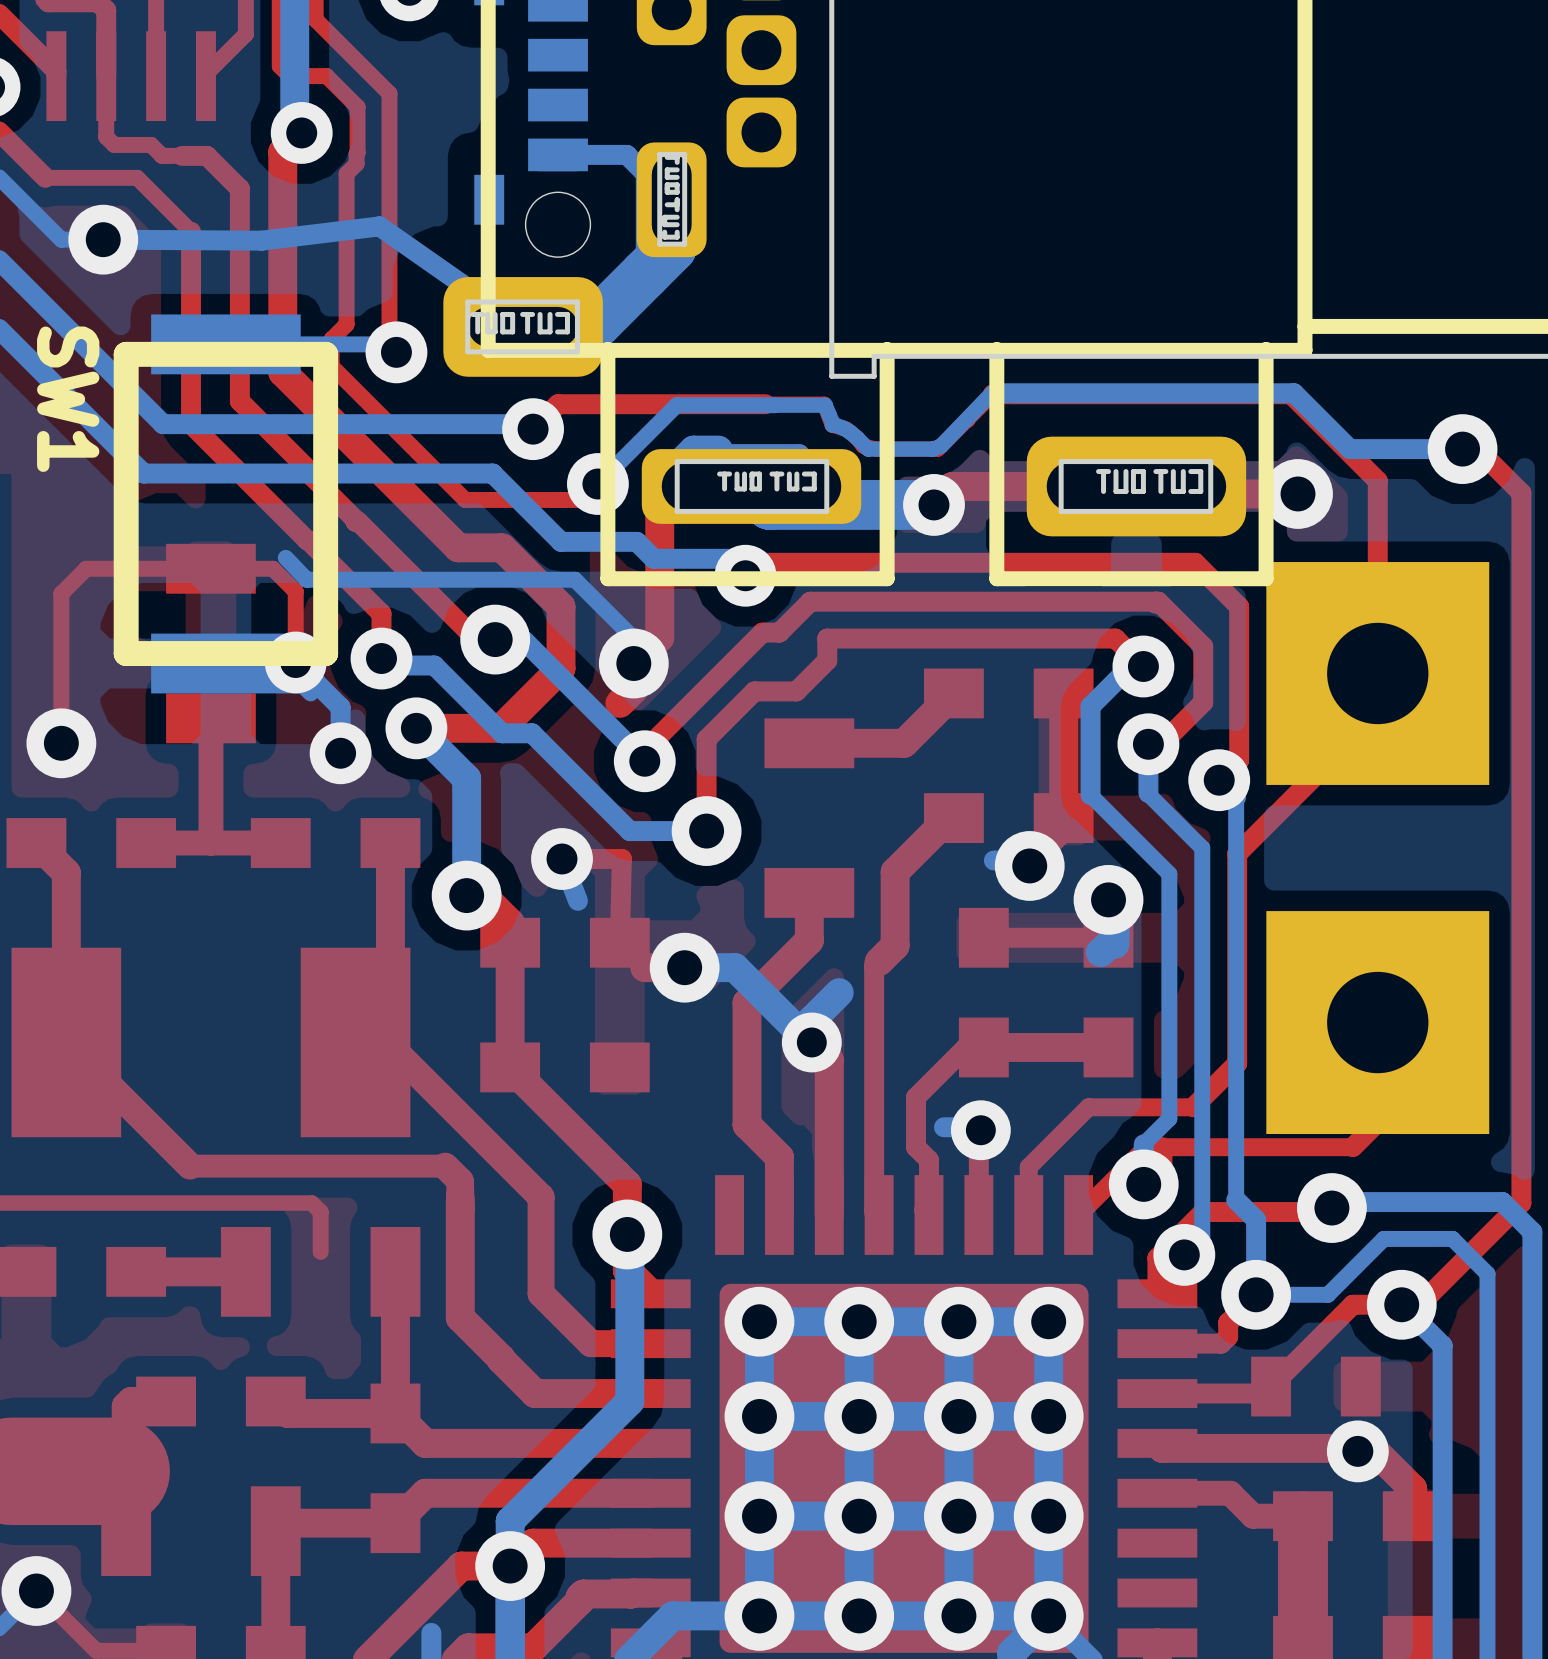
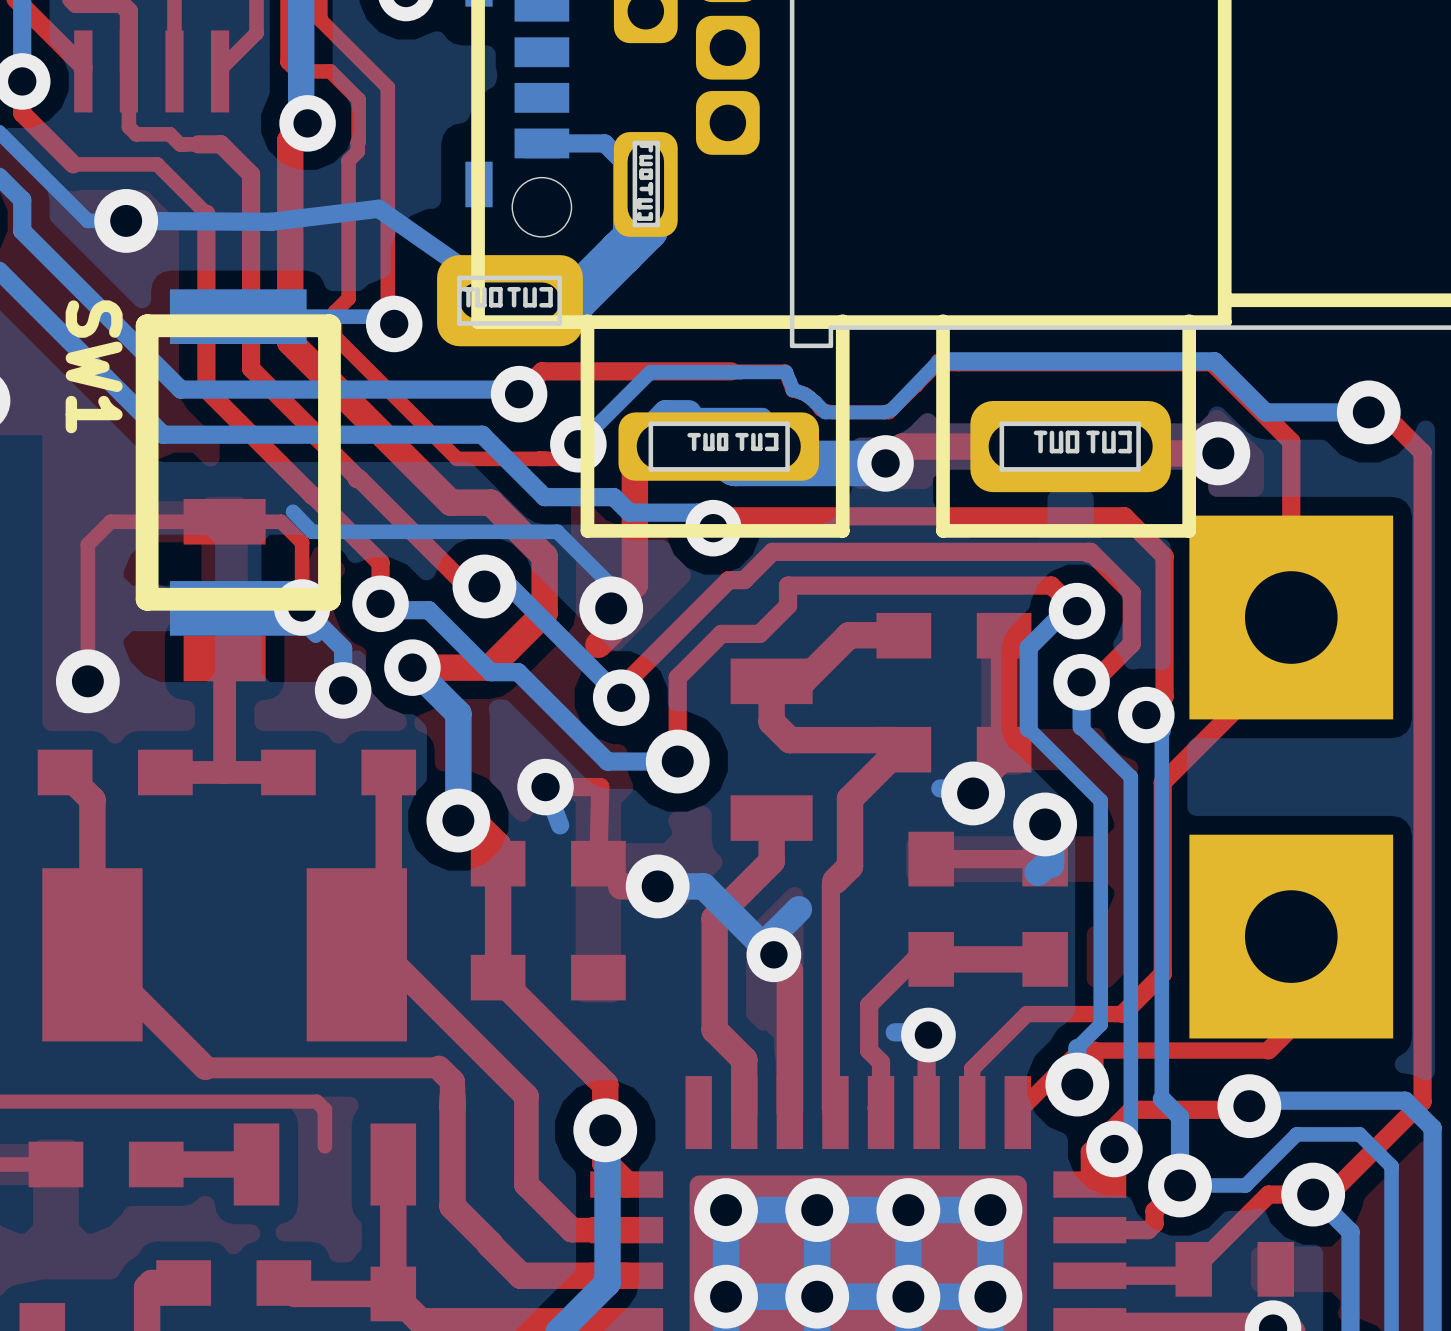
top track: (953, 693) (904, 743) (843, 743) -> (903, 635) (849, 635) (803, 681)
top track: none -> (771, 681) (771, 721) (789, 740) (894, 740) (903, 749)

